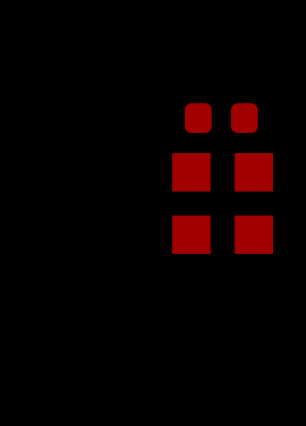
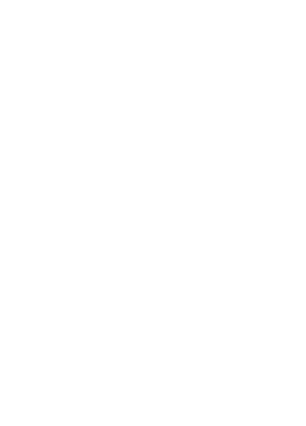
part: (221, 118) -> none
part: (222, 203) -> none

